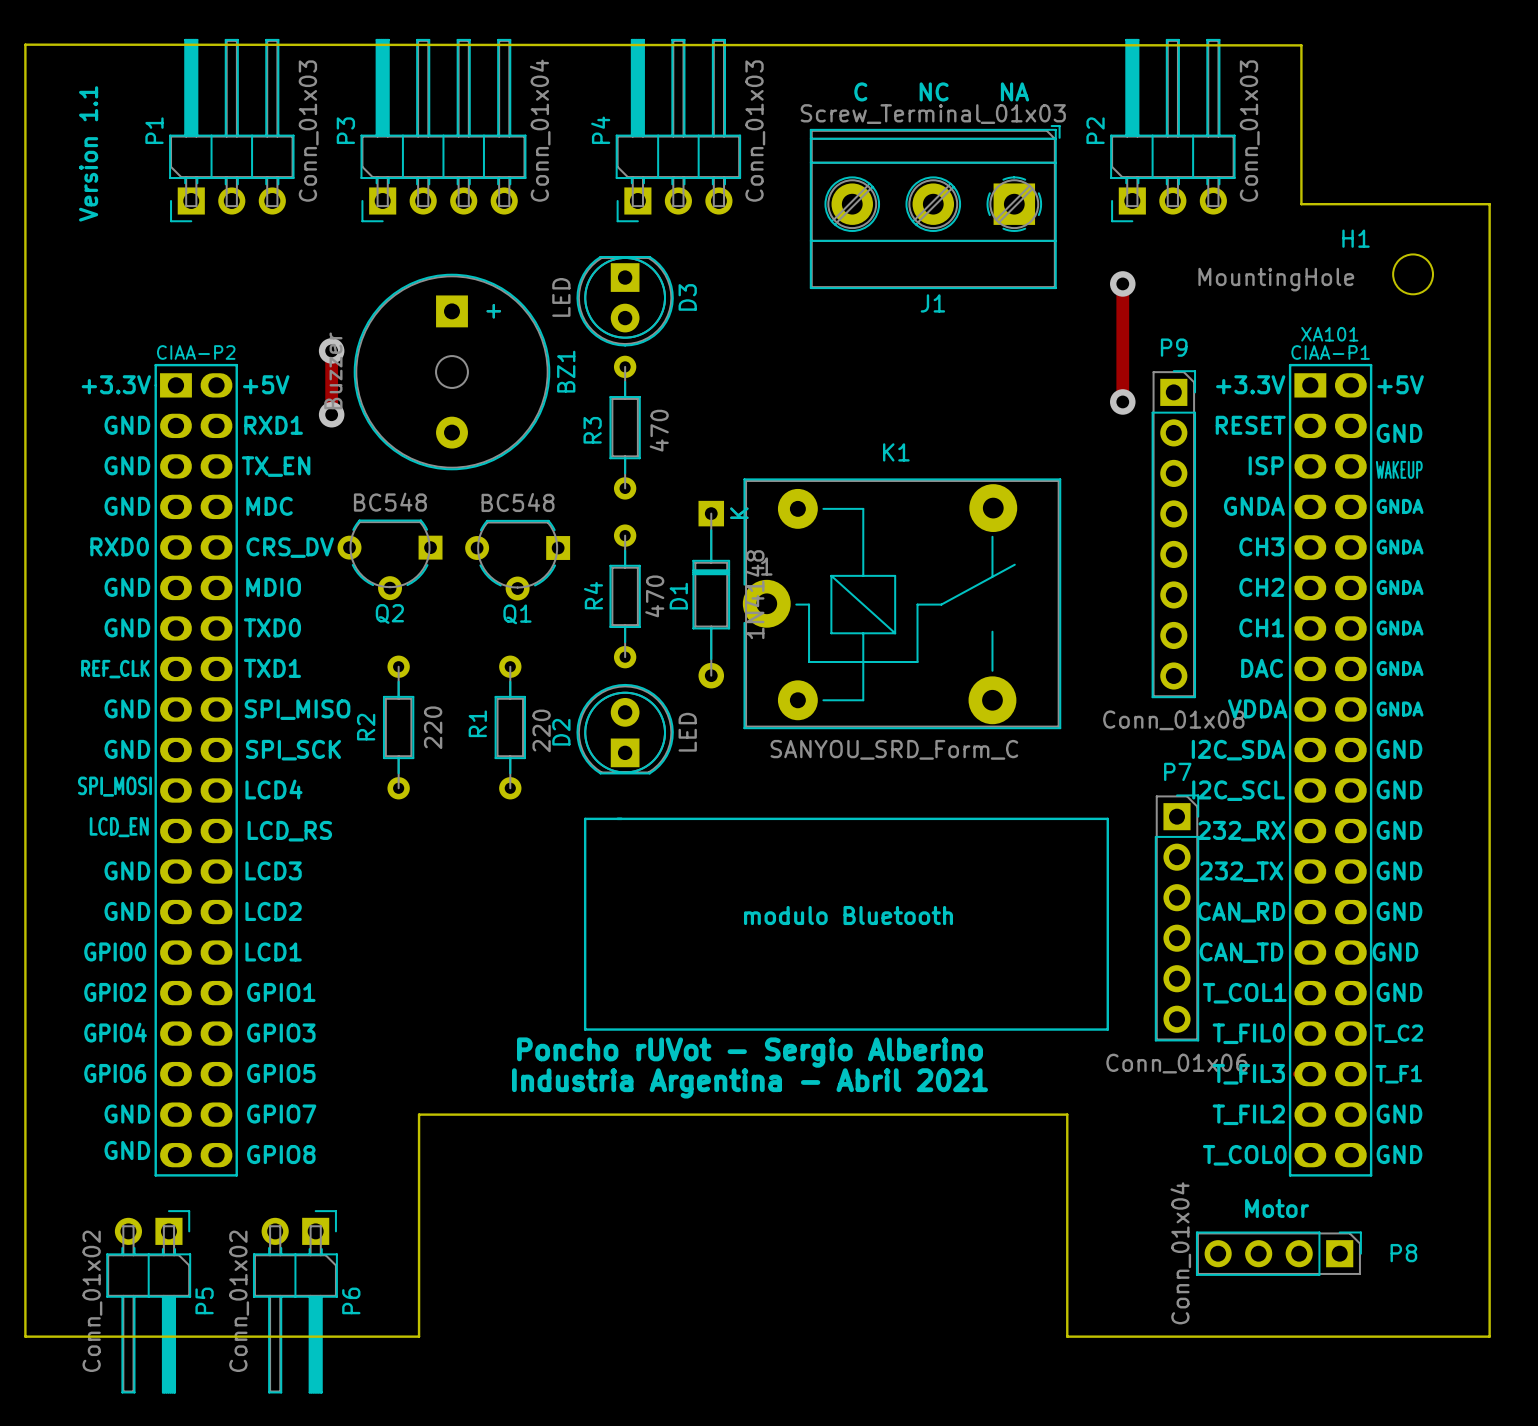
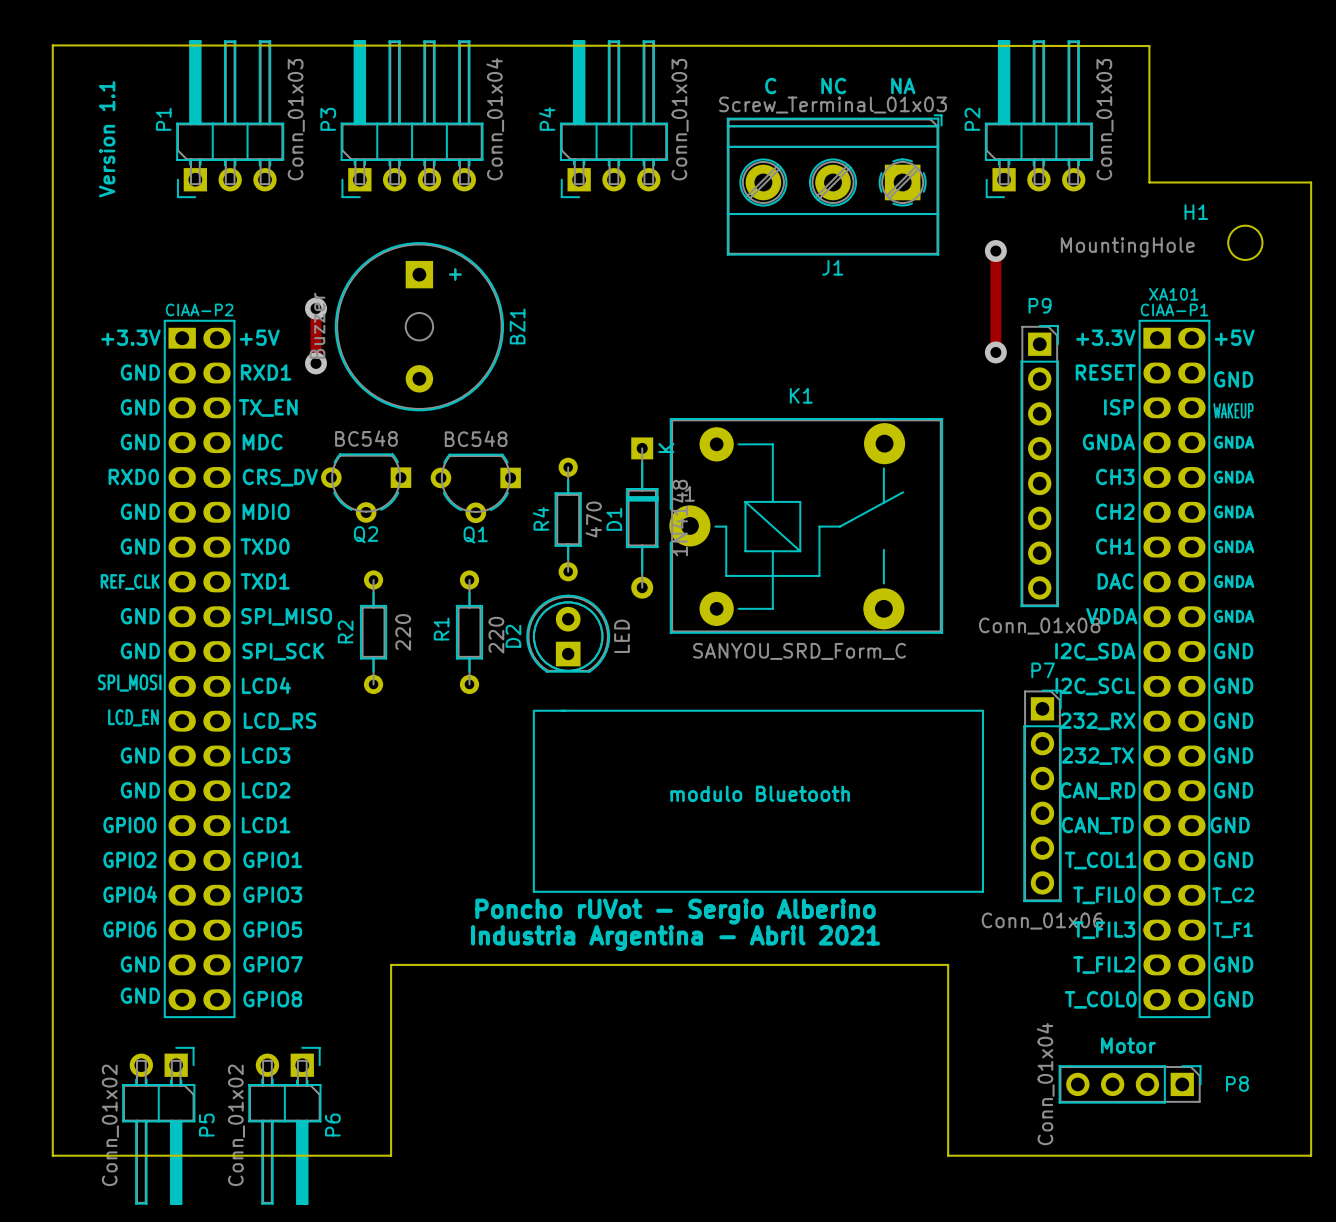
D3: LED (625, 301) -> none
R3: 470 (625, 427) -> none

